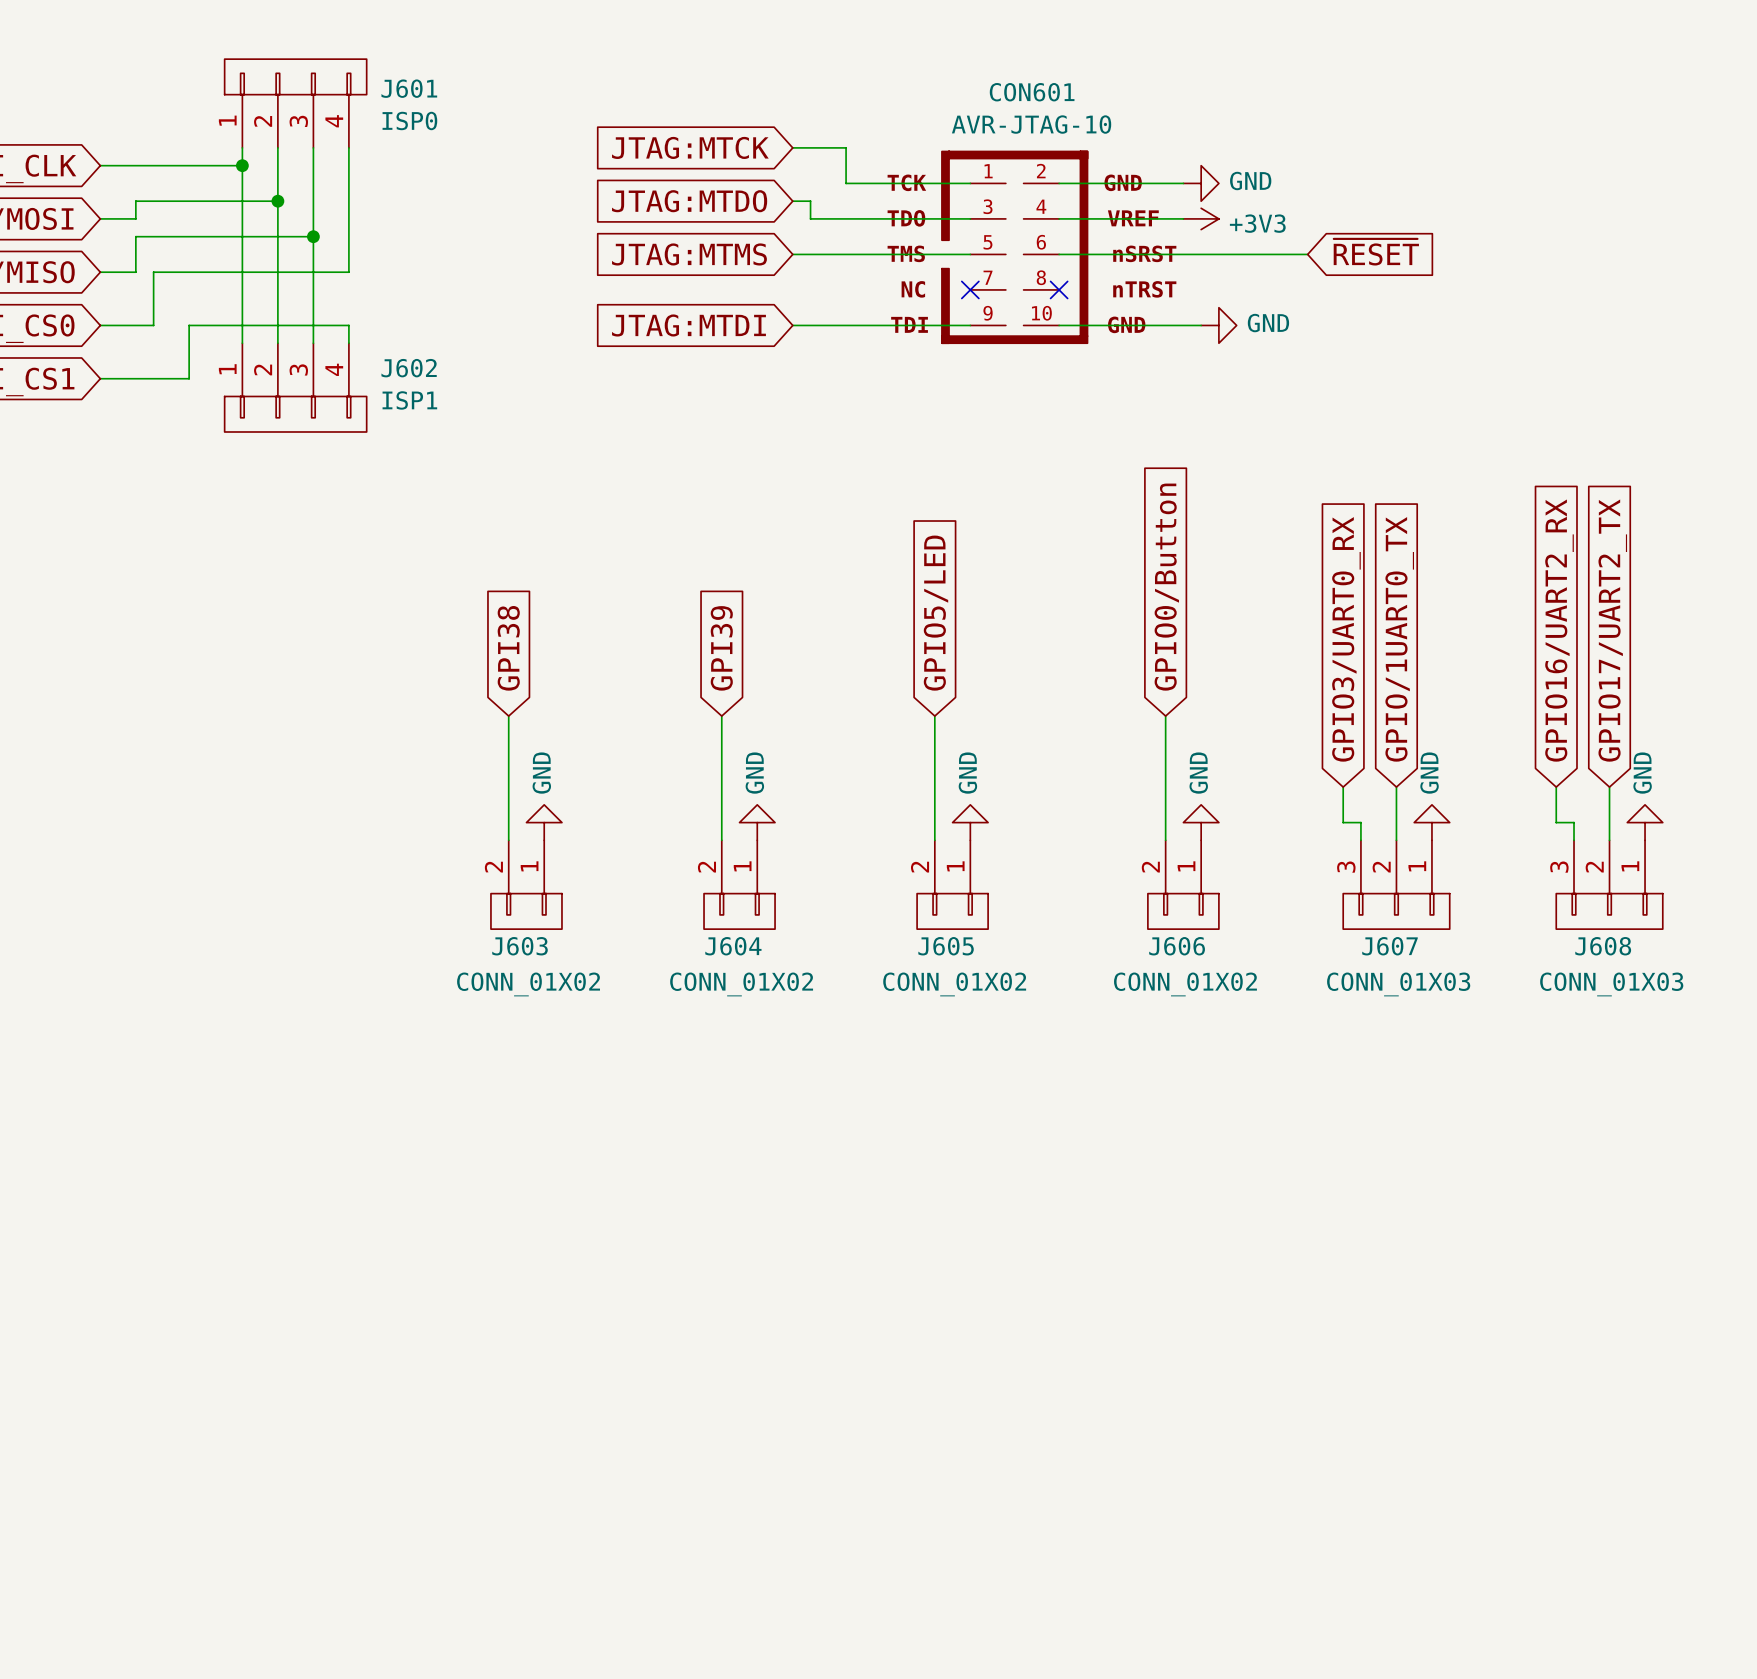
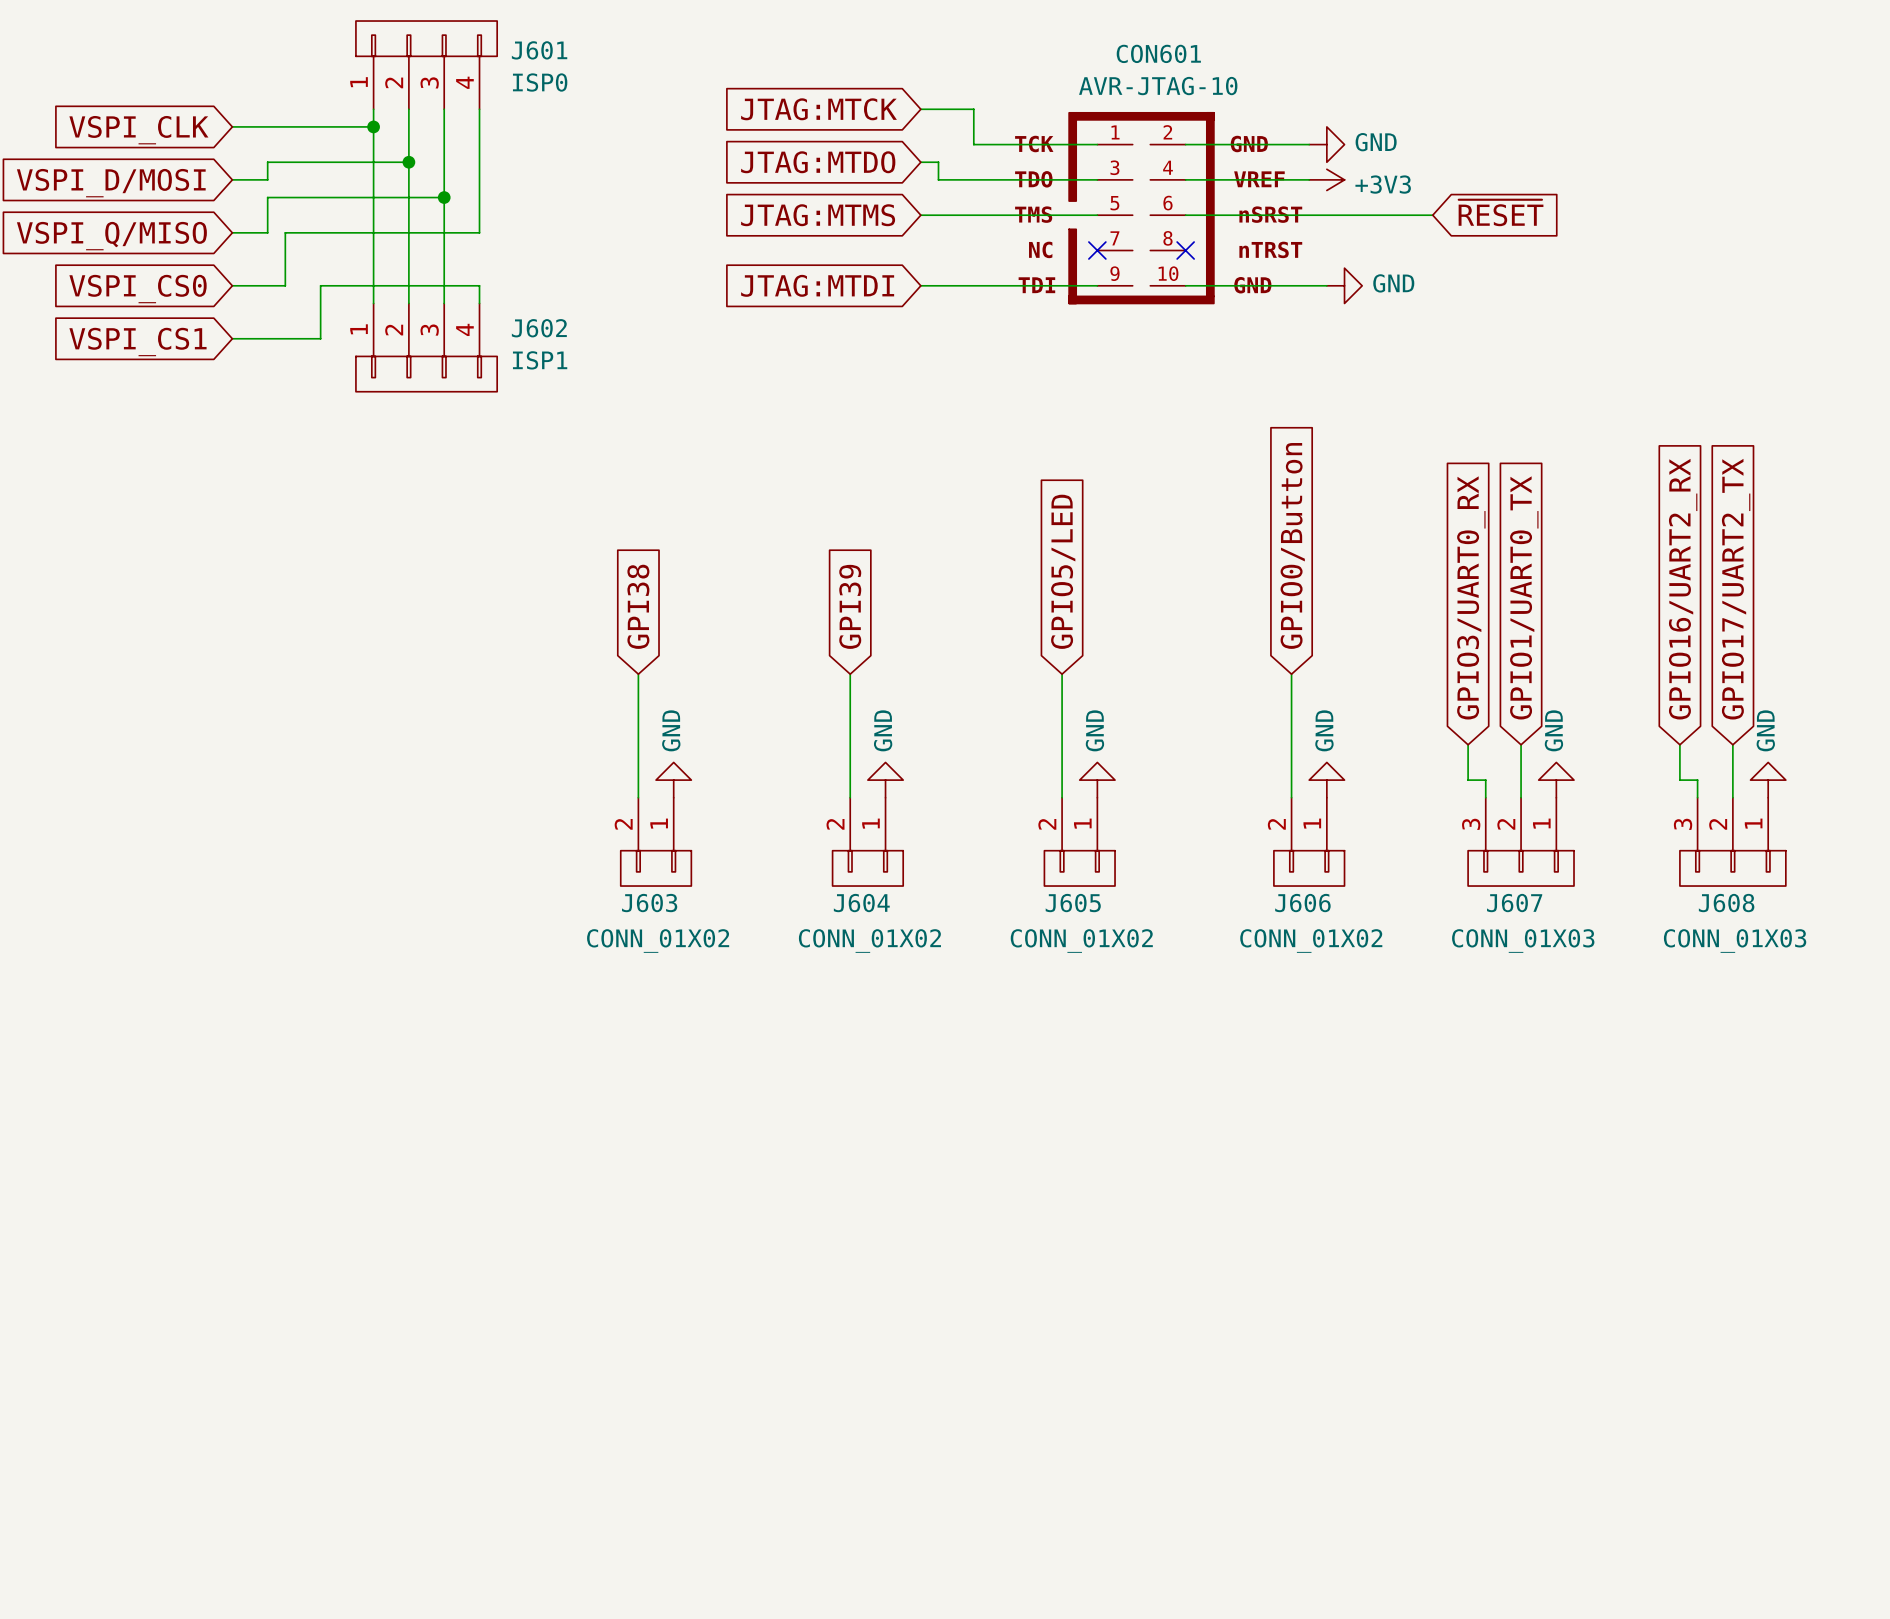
global label: GPIO/1UART0_TX (1399, 639) -> GPIO1/UART0_TX (1524, 597)

